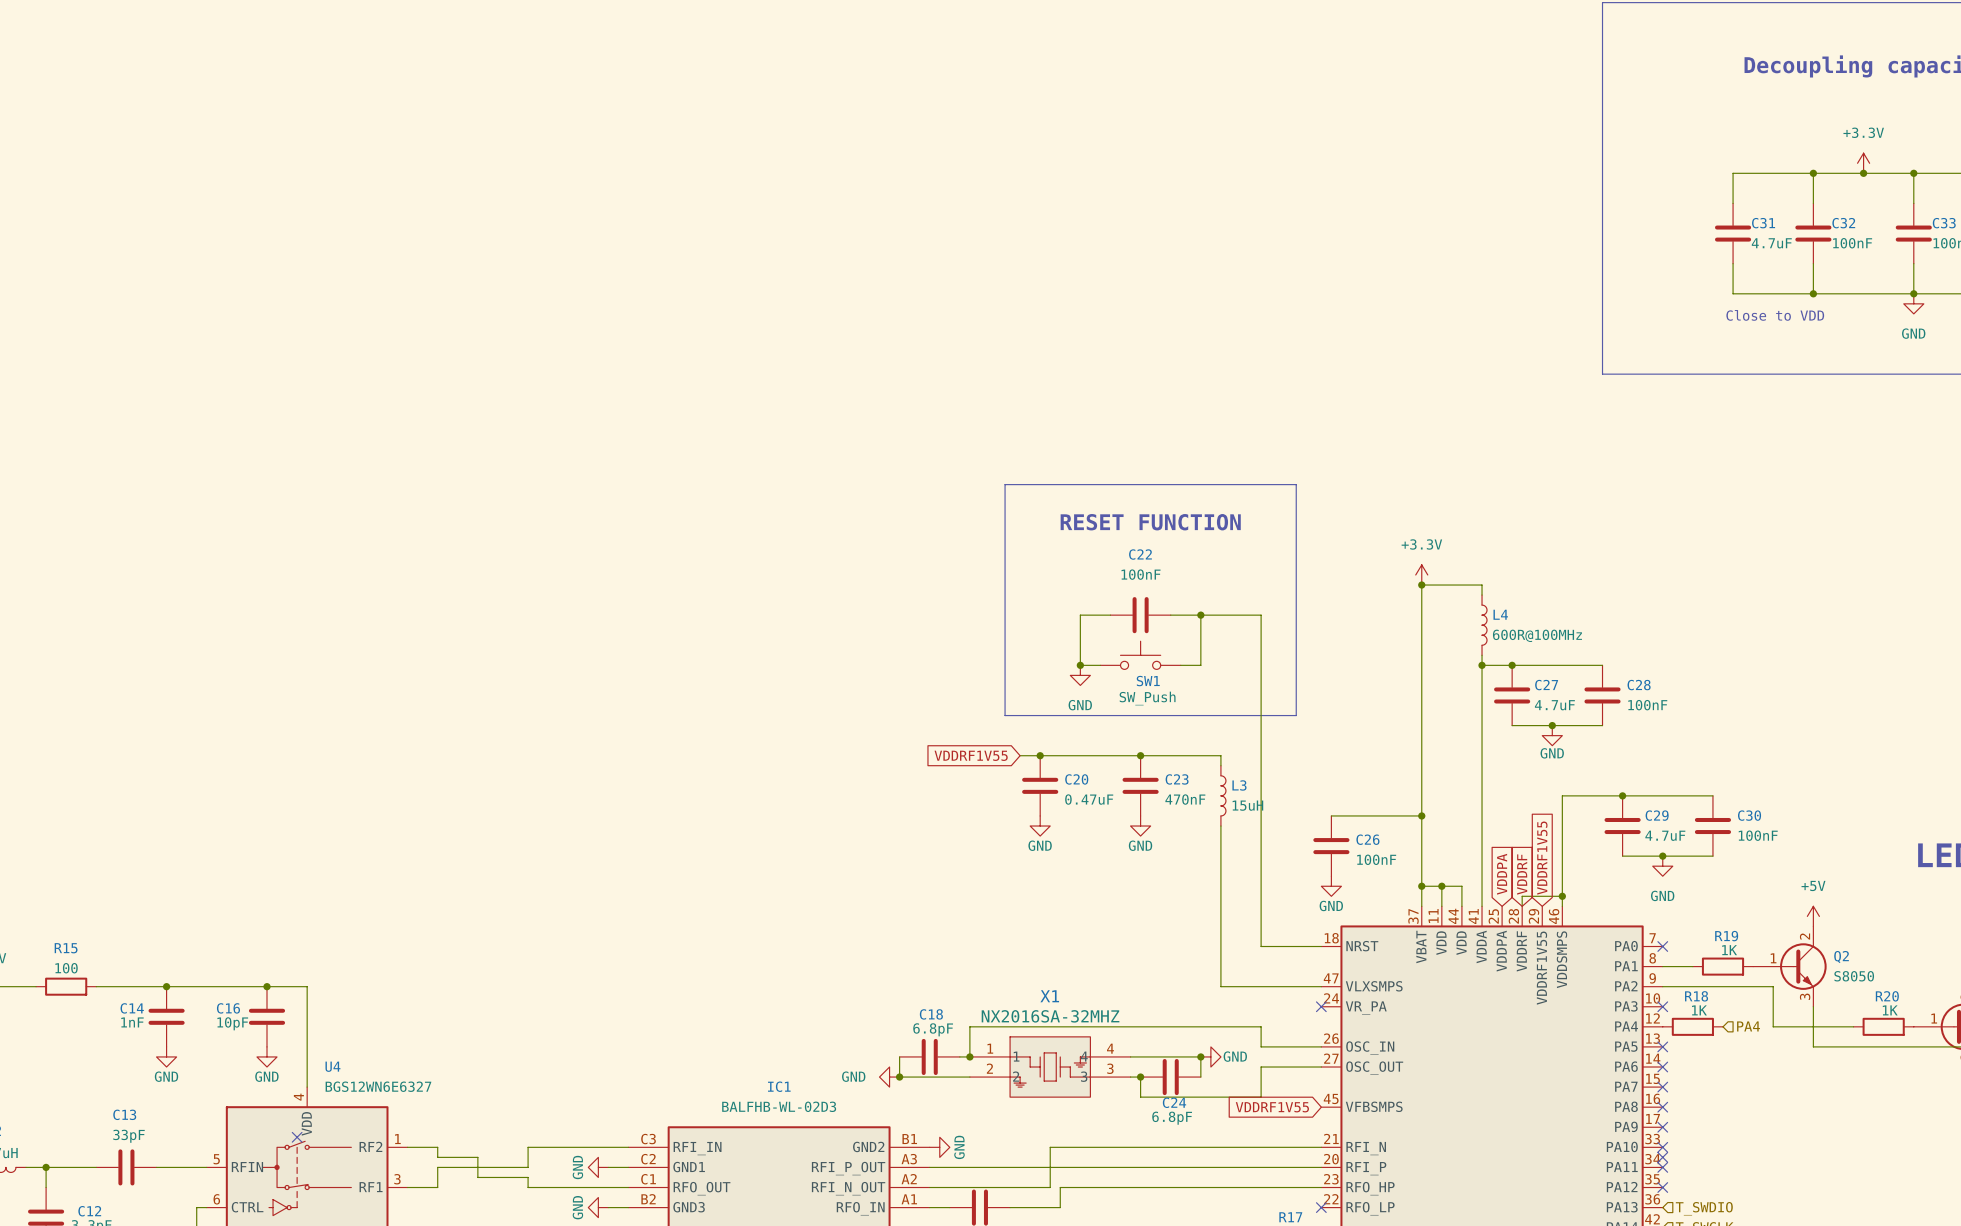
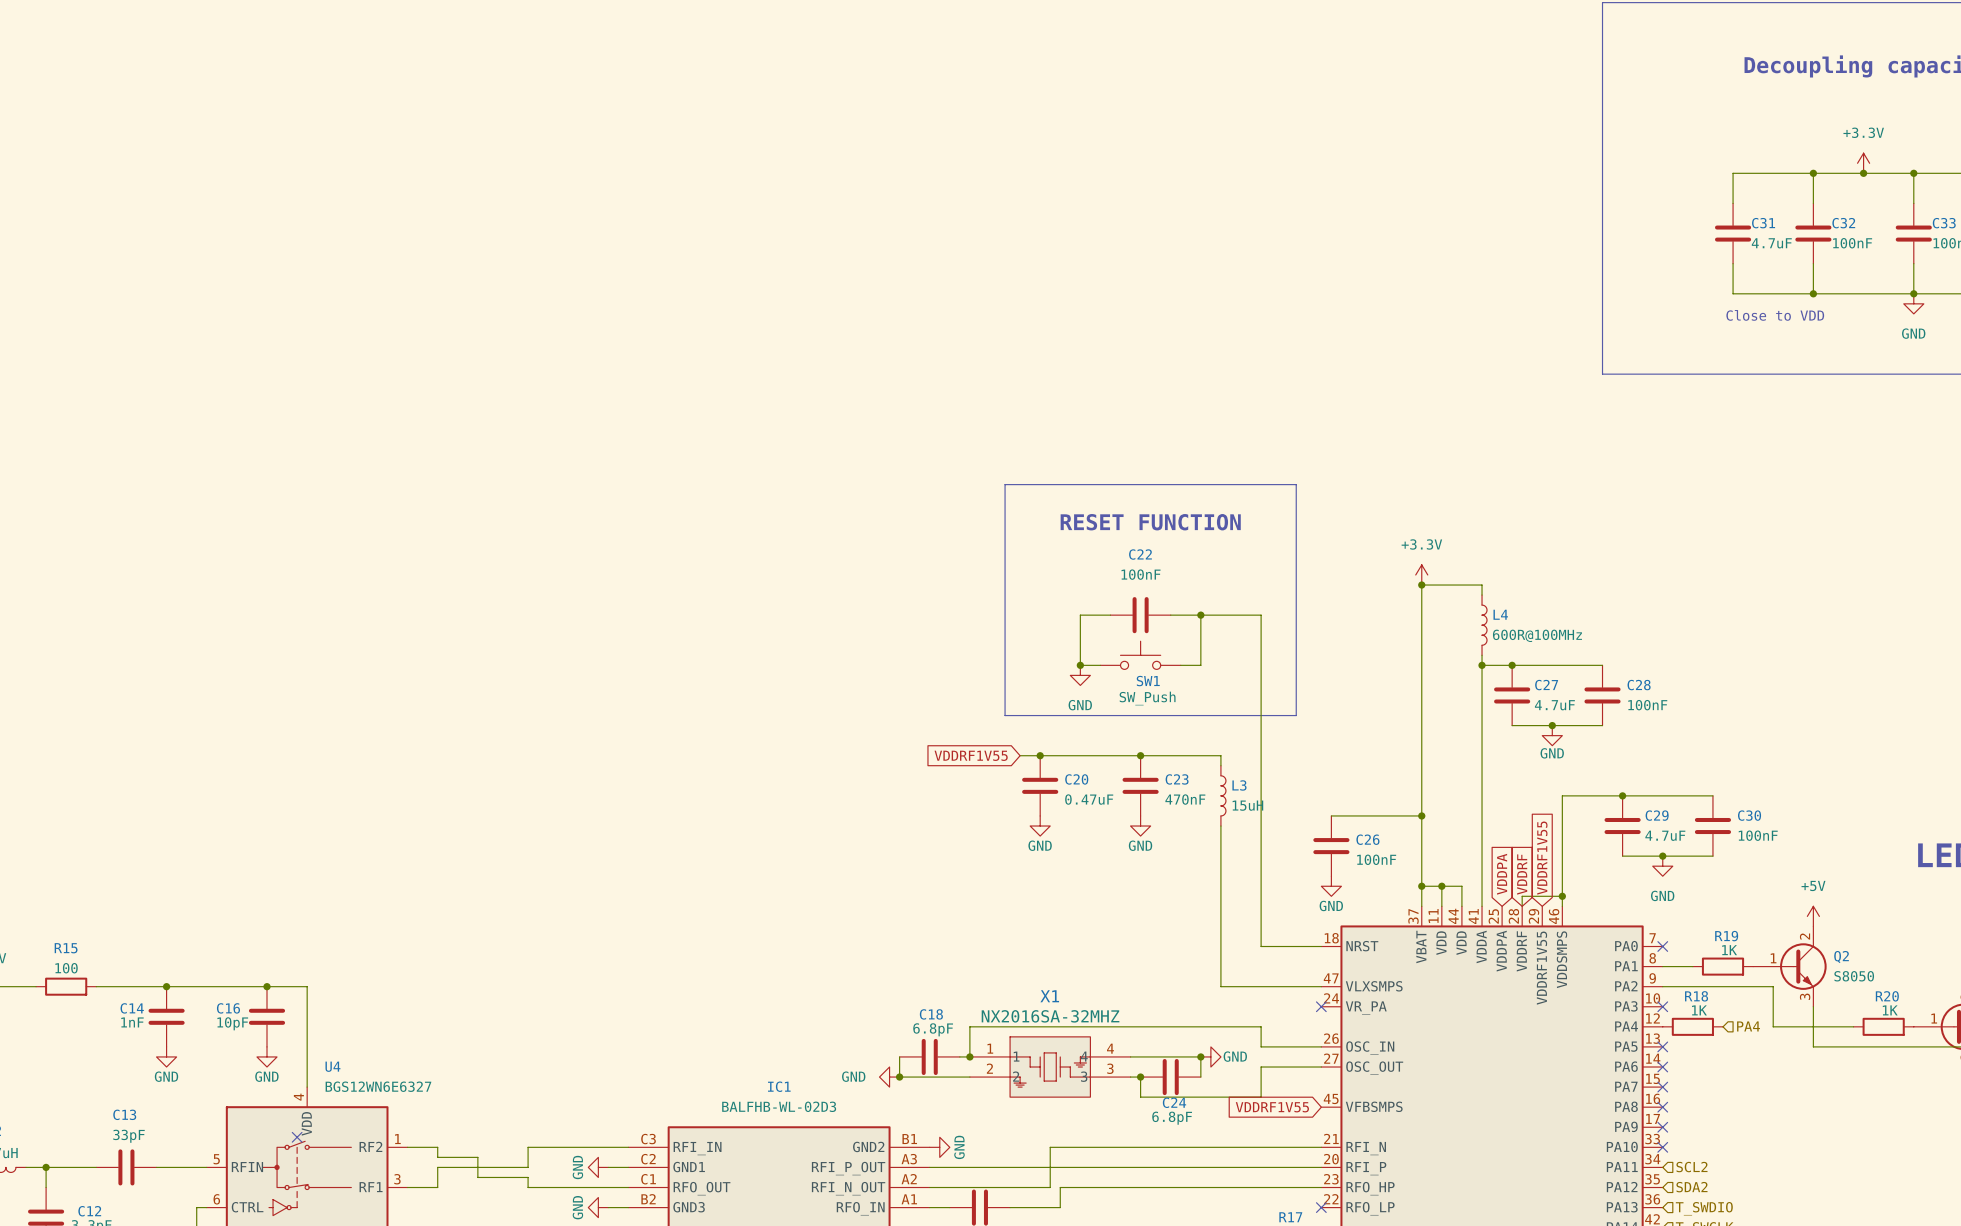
no-connect mark: (1662, 1157) -> none
no-connect mark: (1662, 1167) -> none
hierarchical label: none -> SCL2 (1691, 1167)
no-connect mark: (1662, 1187) -> none
hierarchical label: none -> SDA2 (1691, 1187)

